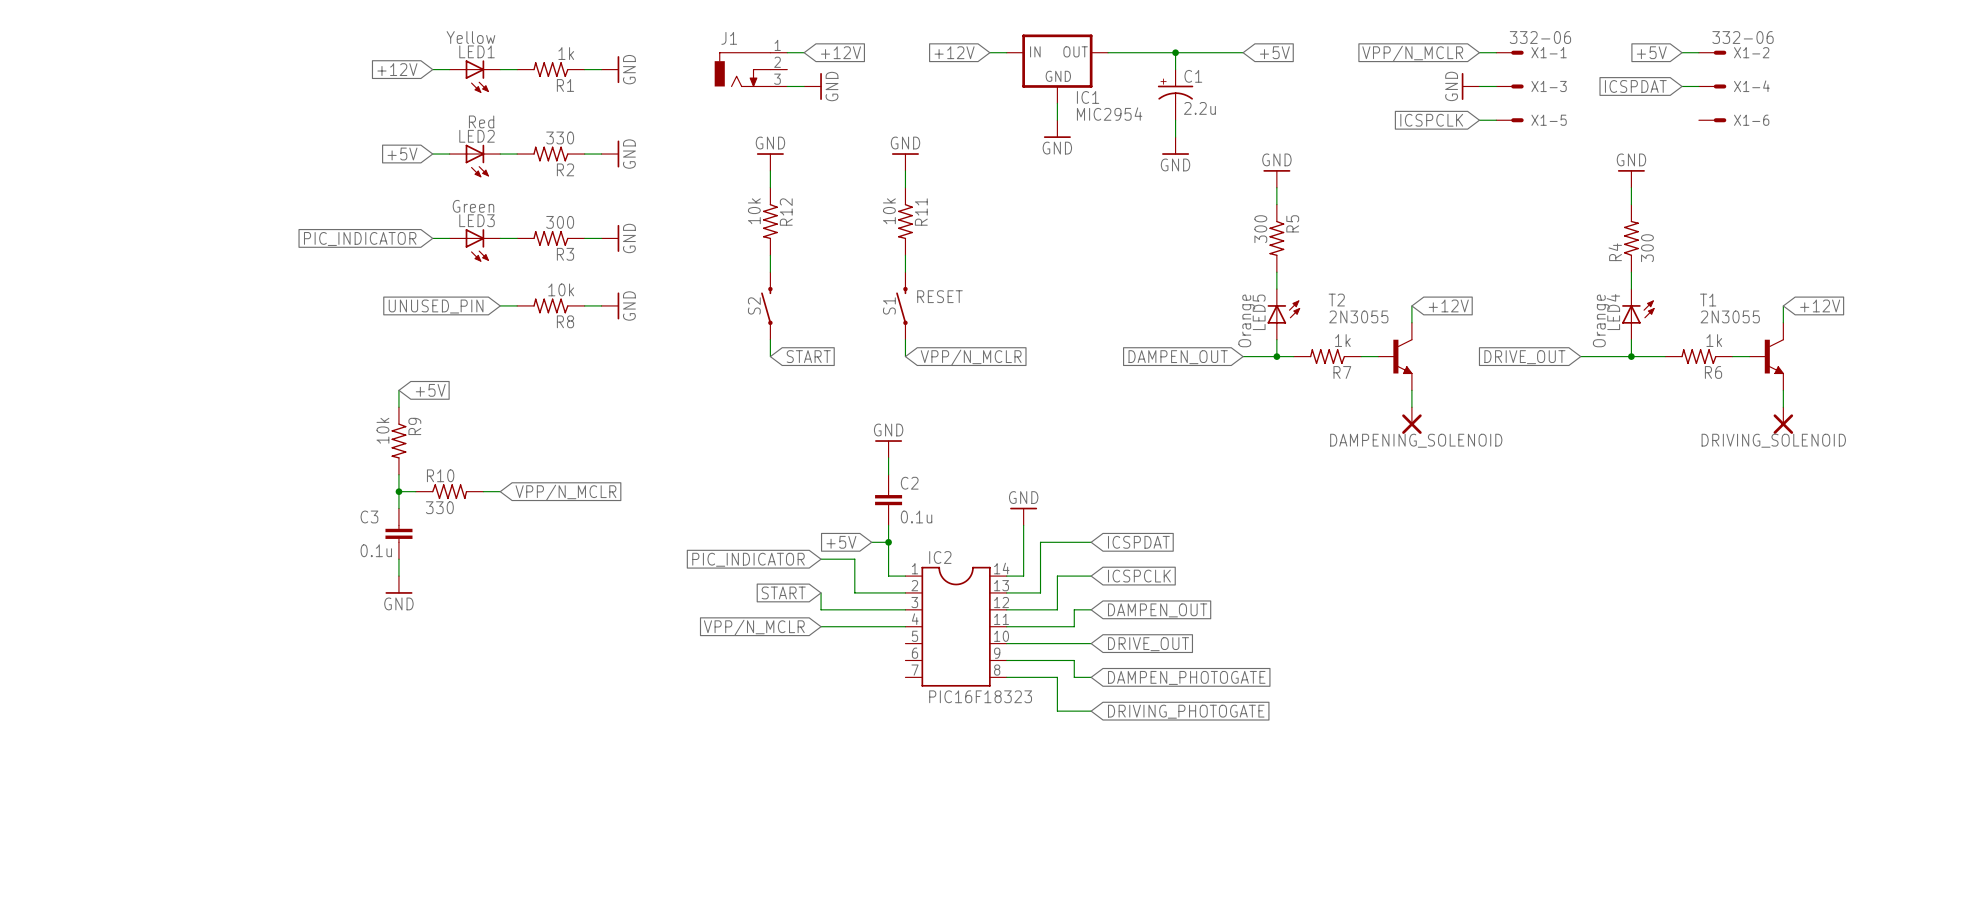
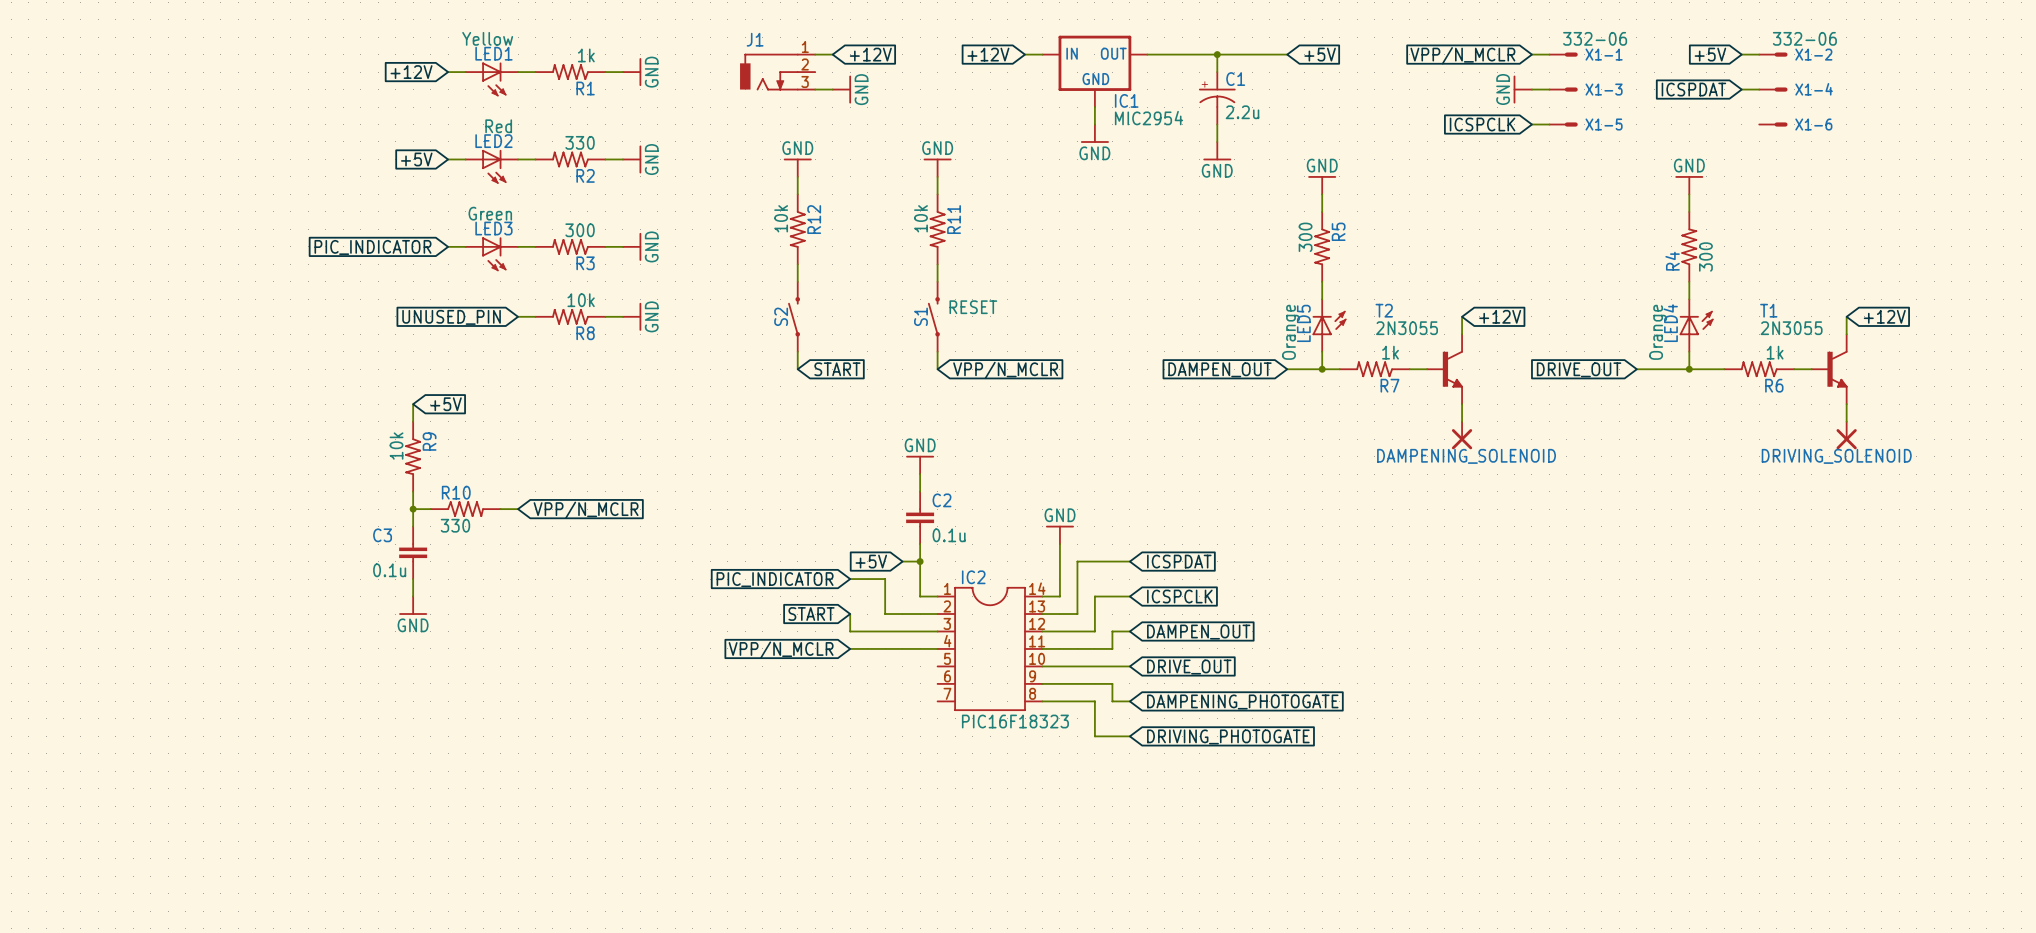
global label: DAMPEN_PHOTOGATE (1186, 677) -> DAMPENING_PHOTOGATE (1242, 702)

